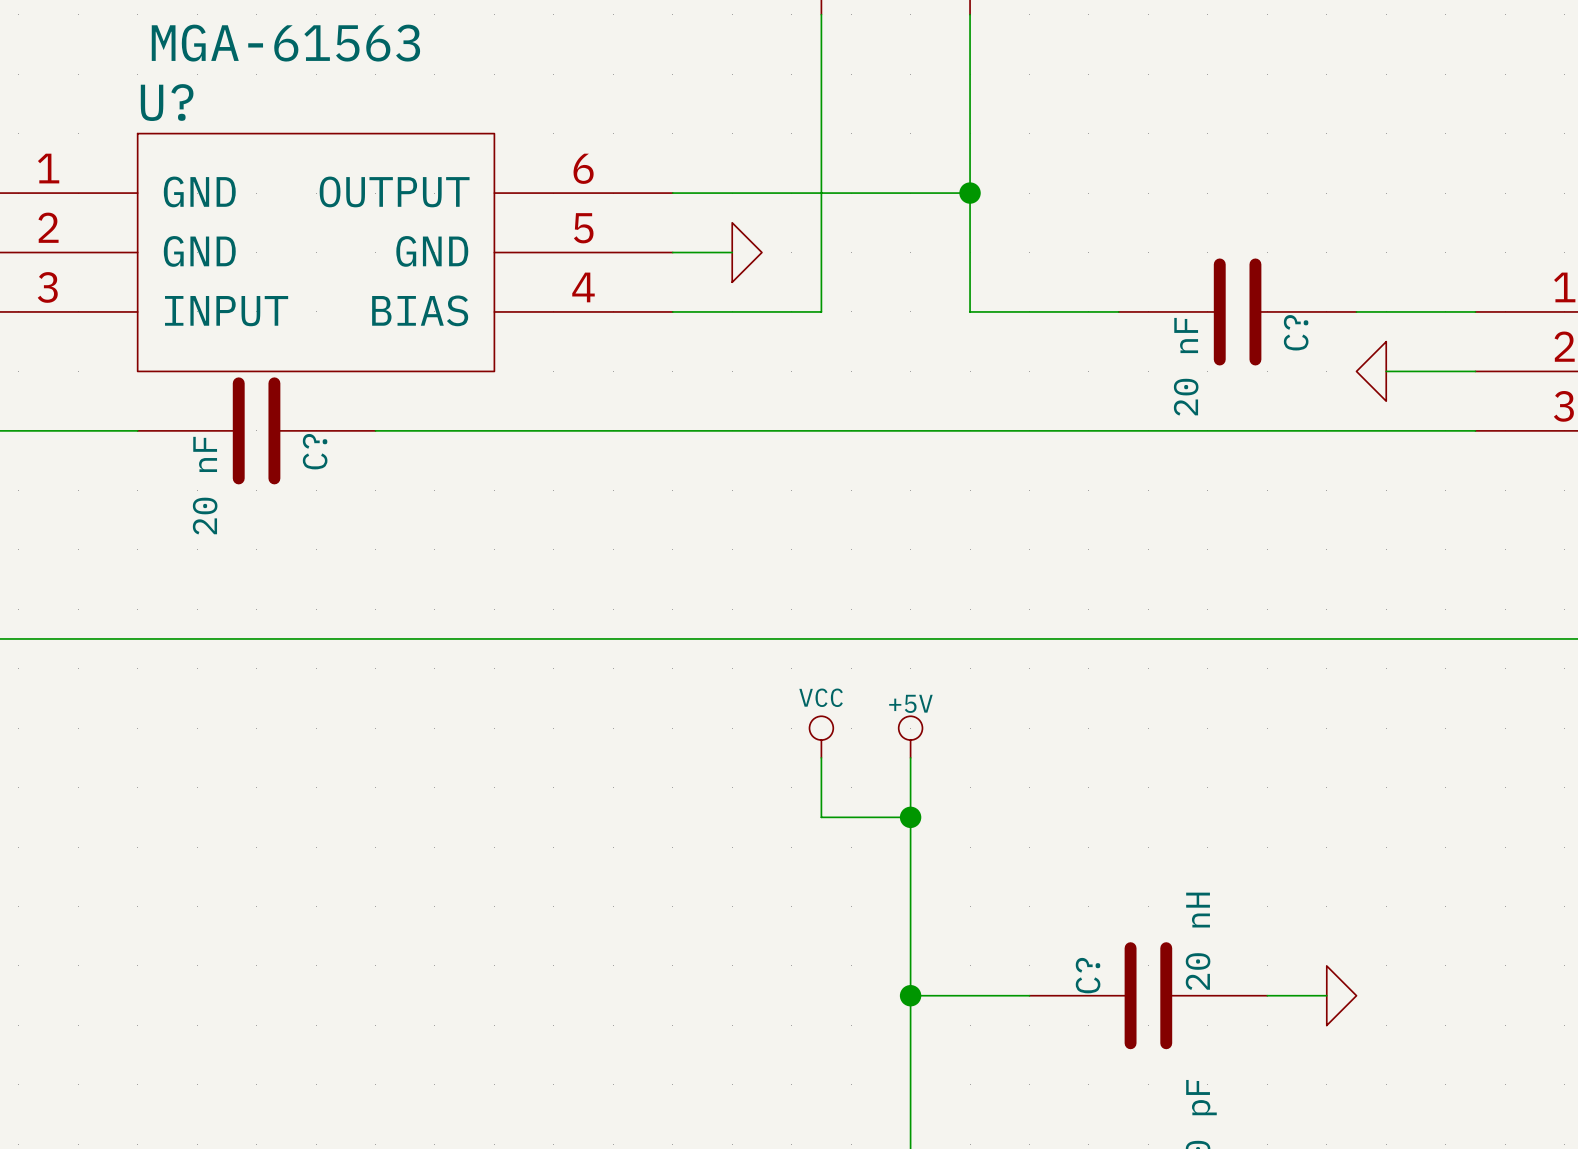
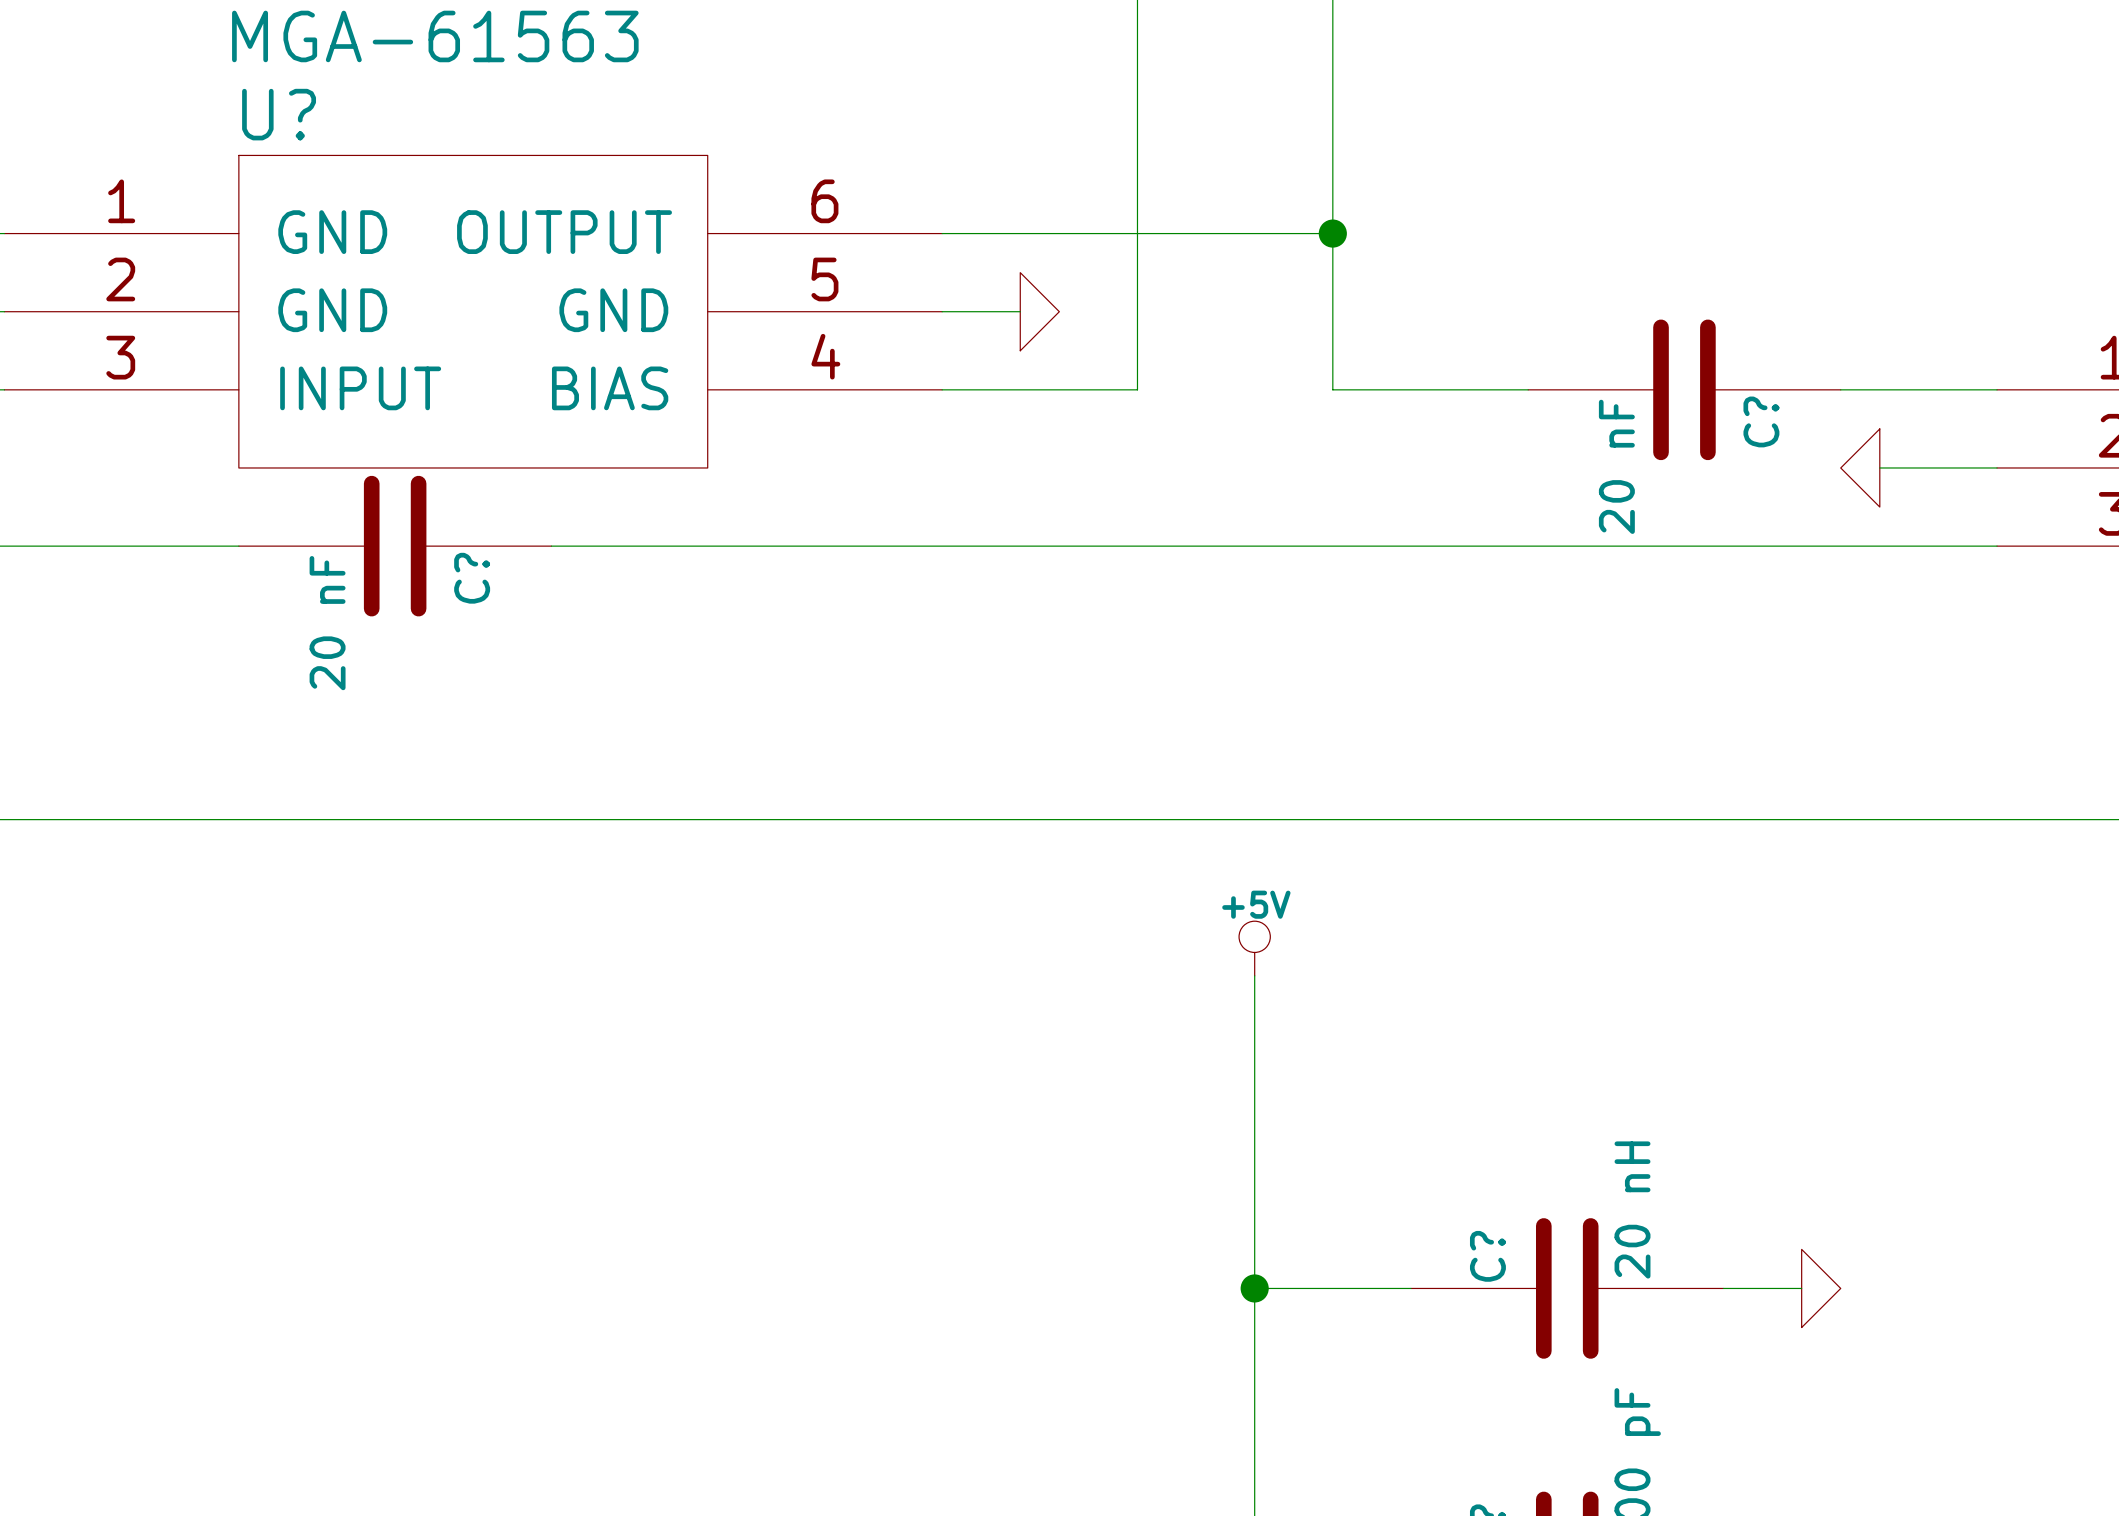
power symbol: VCC (821, 737) -> none
wire: (821, 757) (821, 817) (910, 817) -> none
junction: (910, 817) -> none

